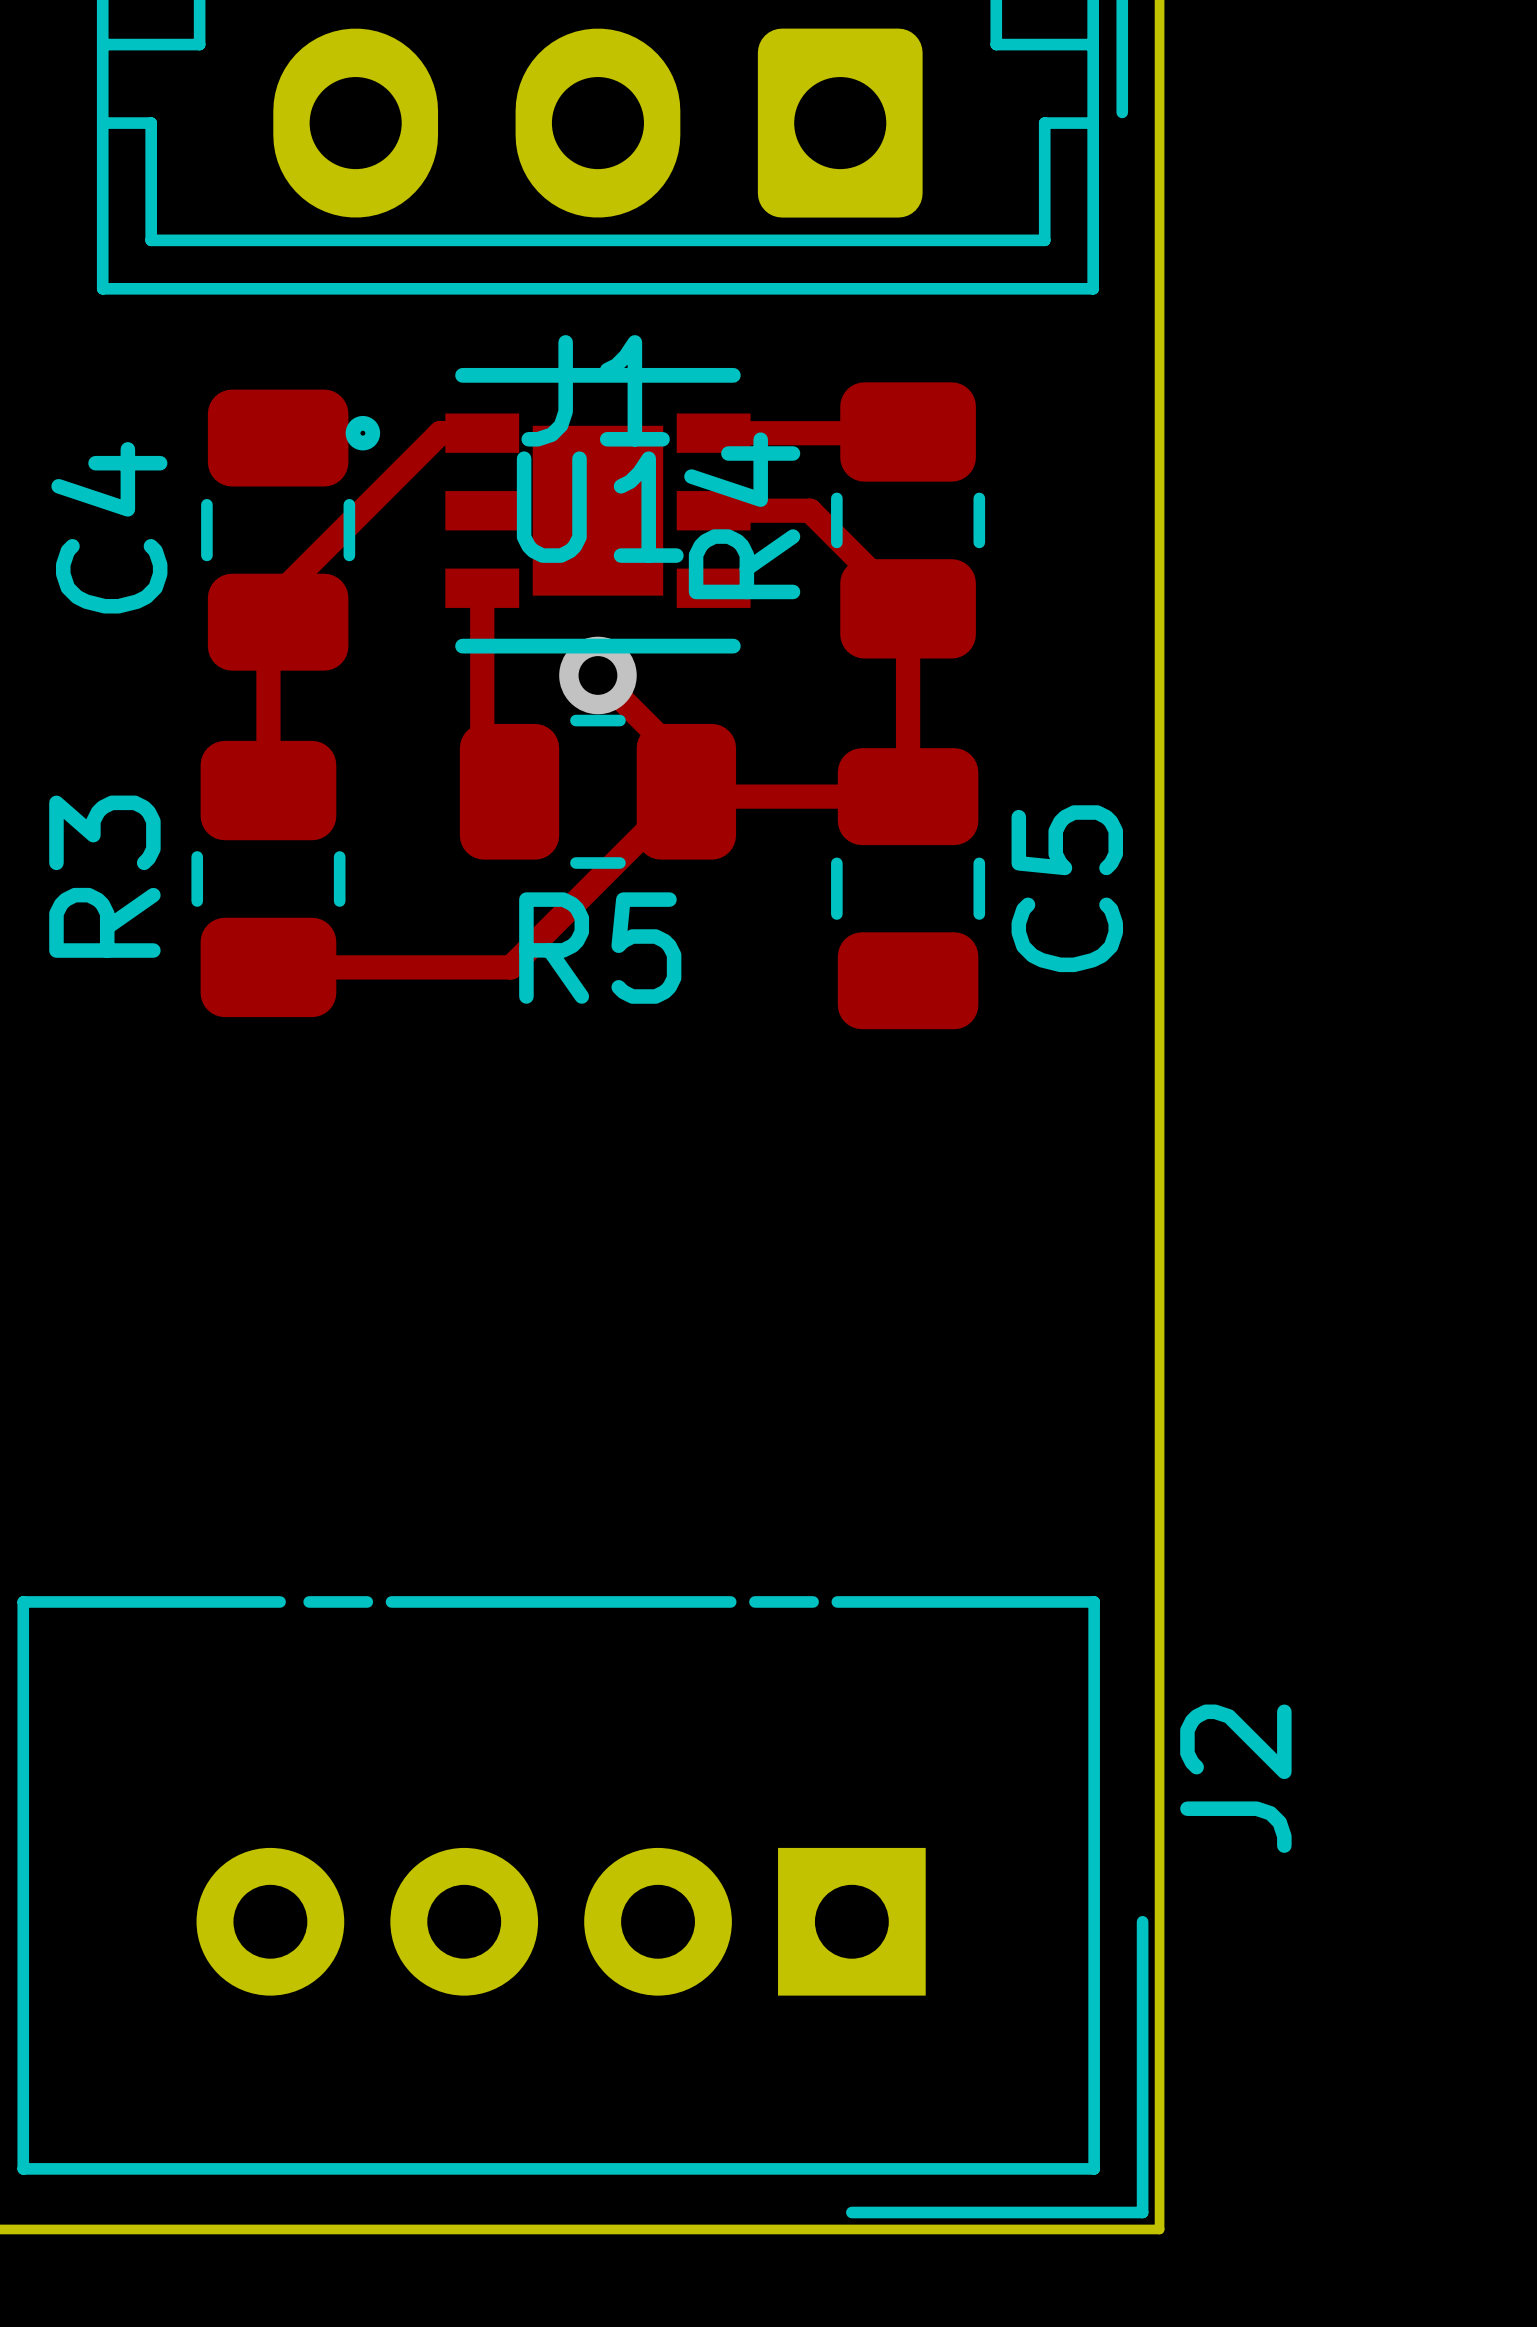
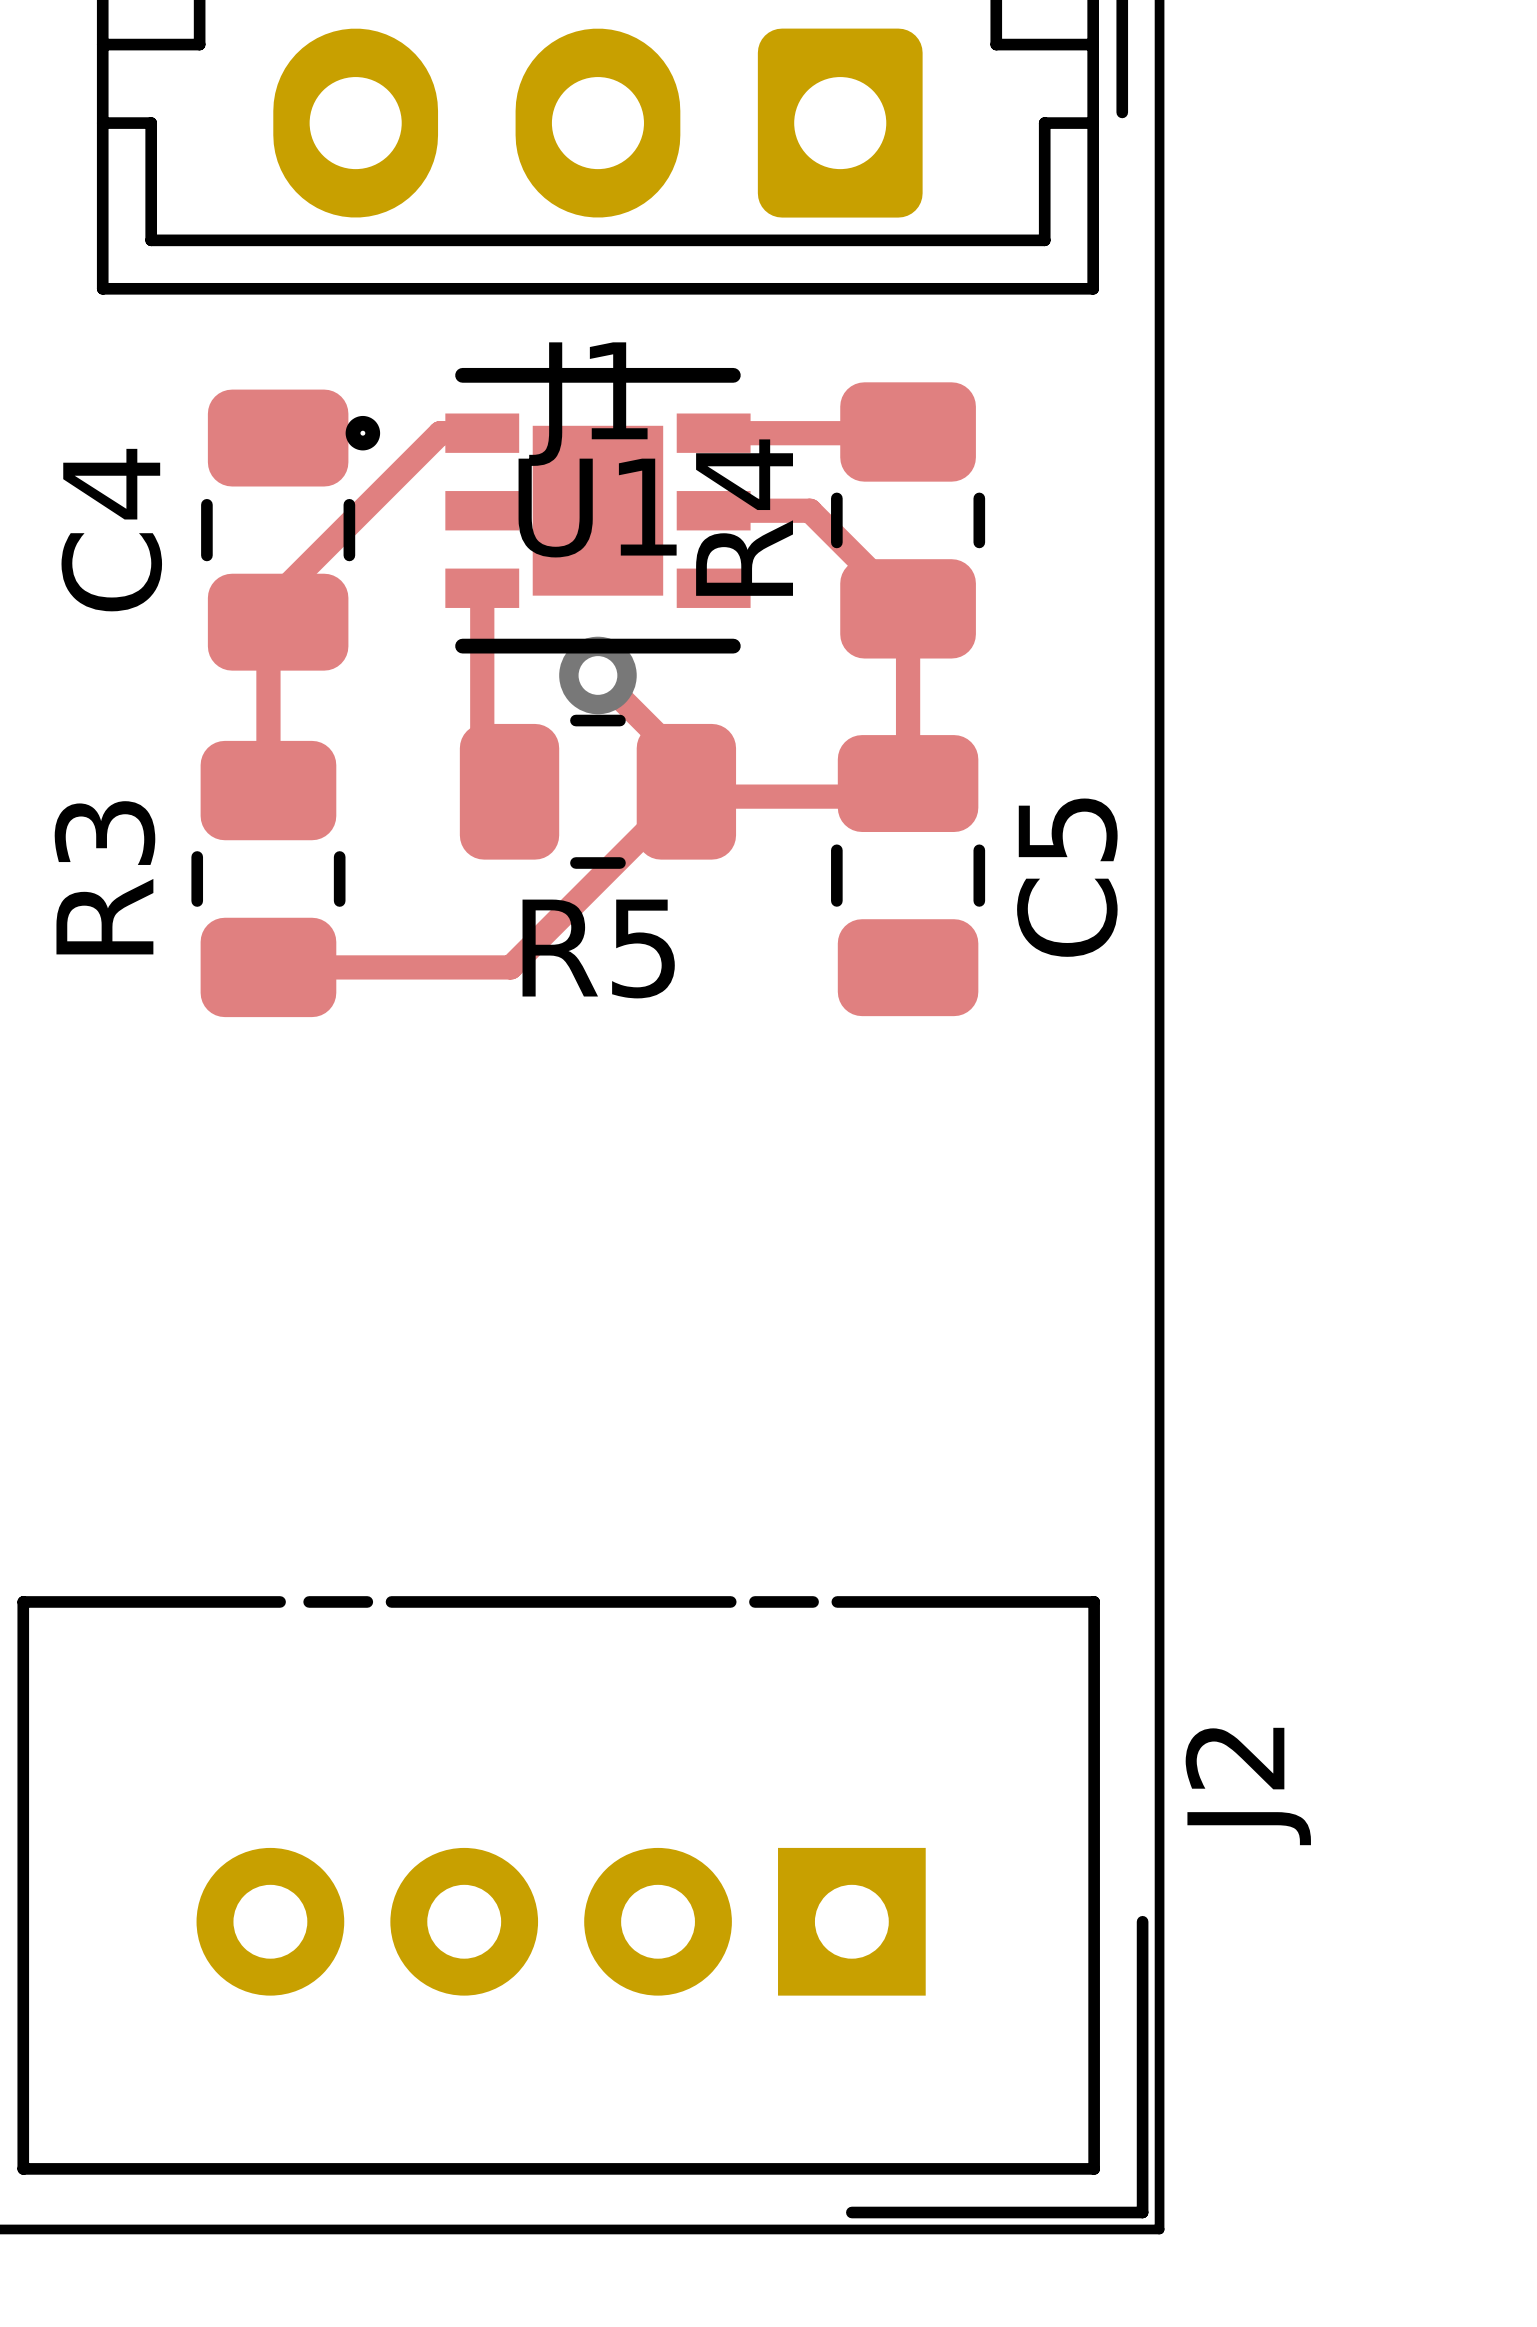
C5 position: (908, 888) -> (908, 875)

